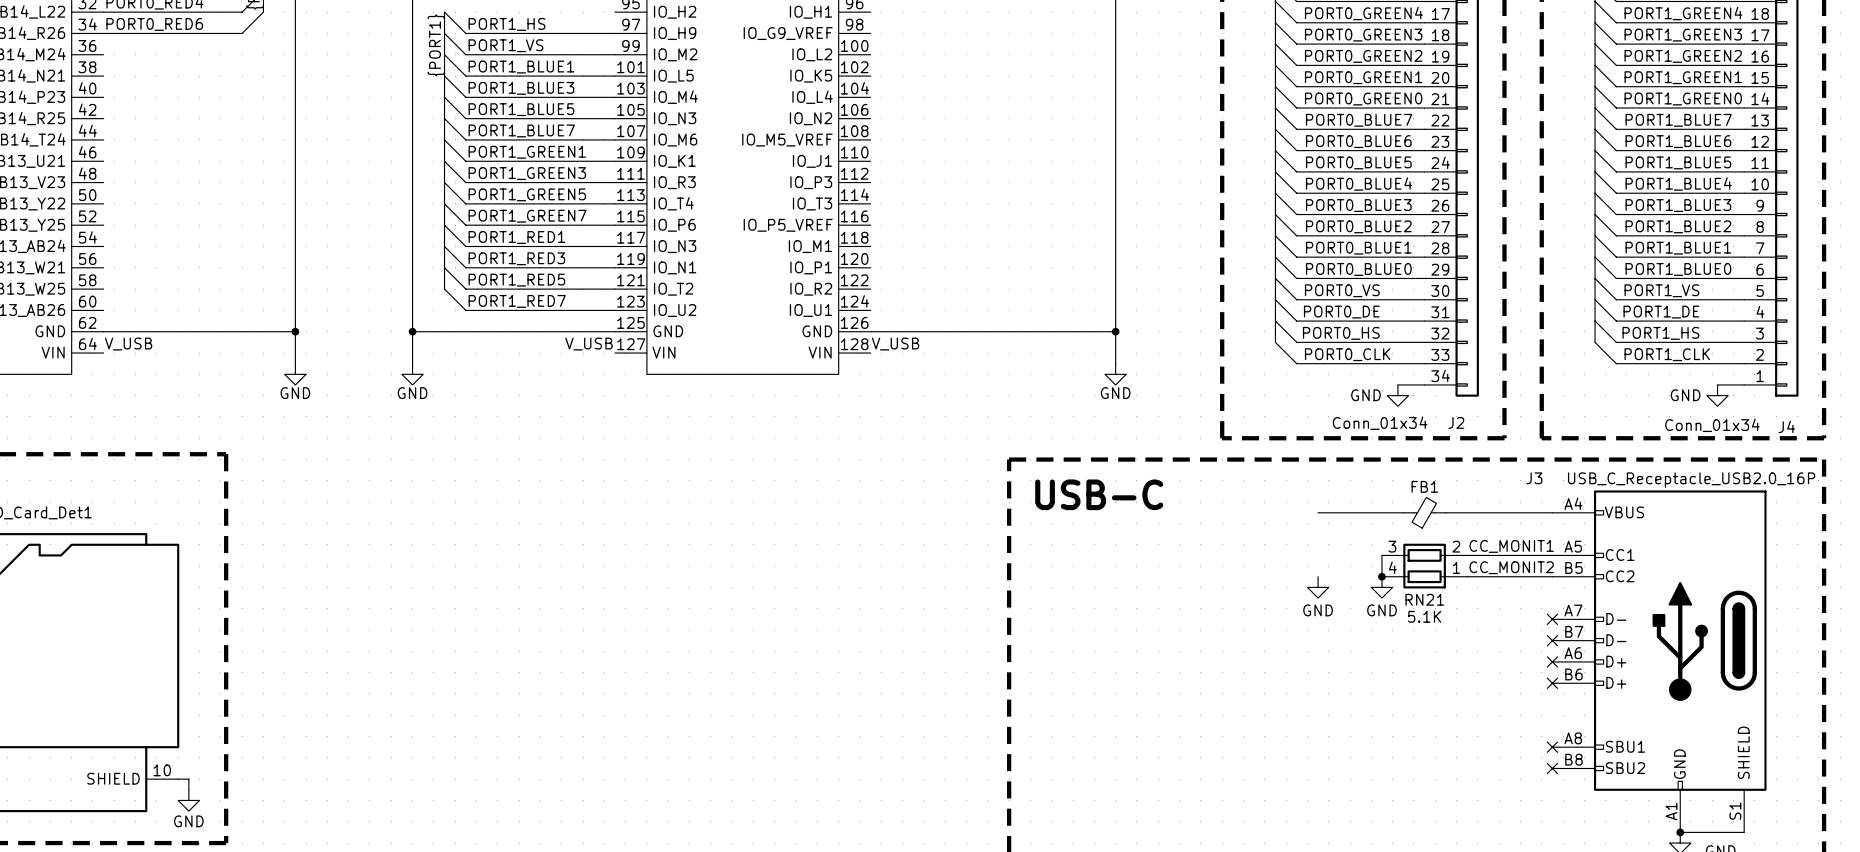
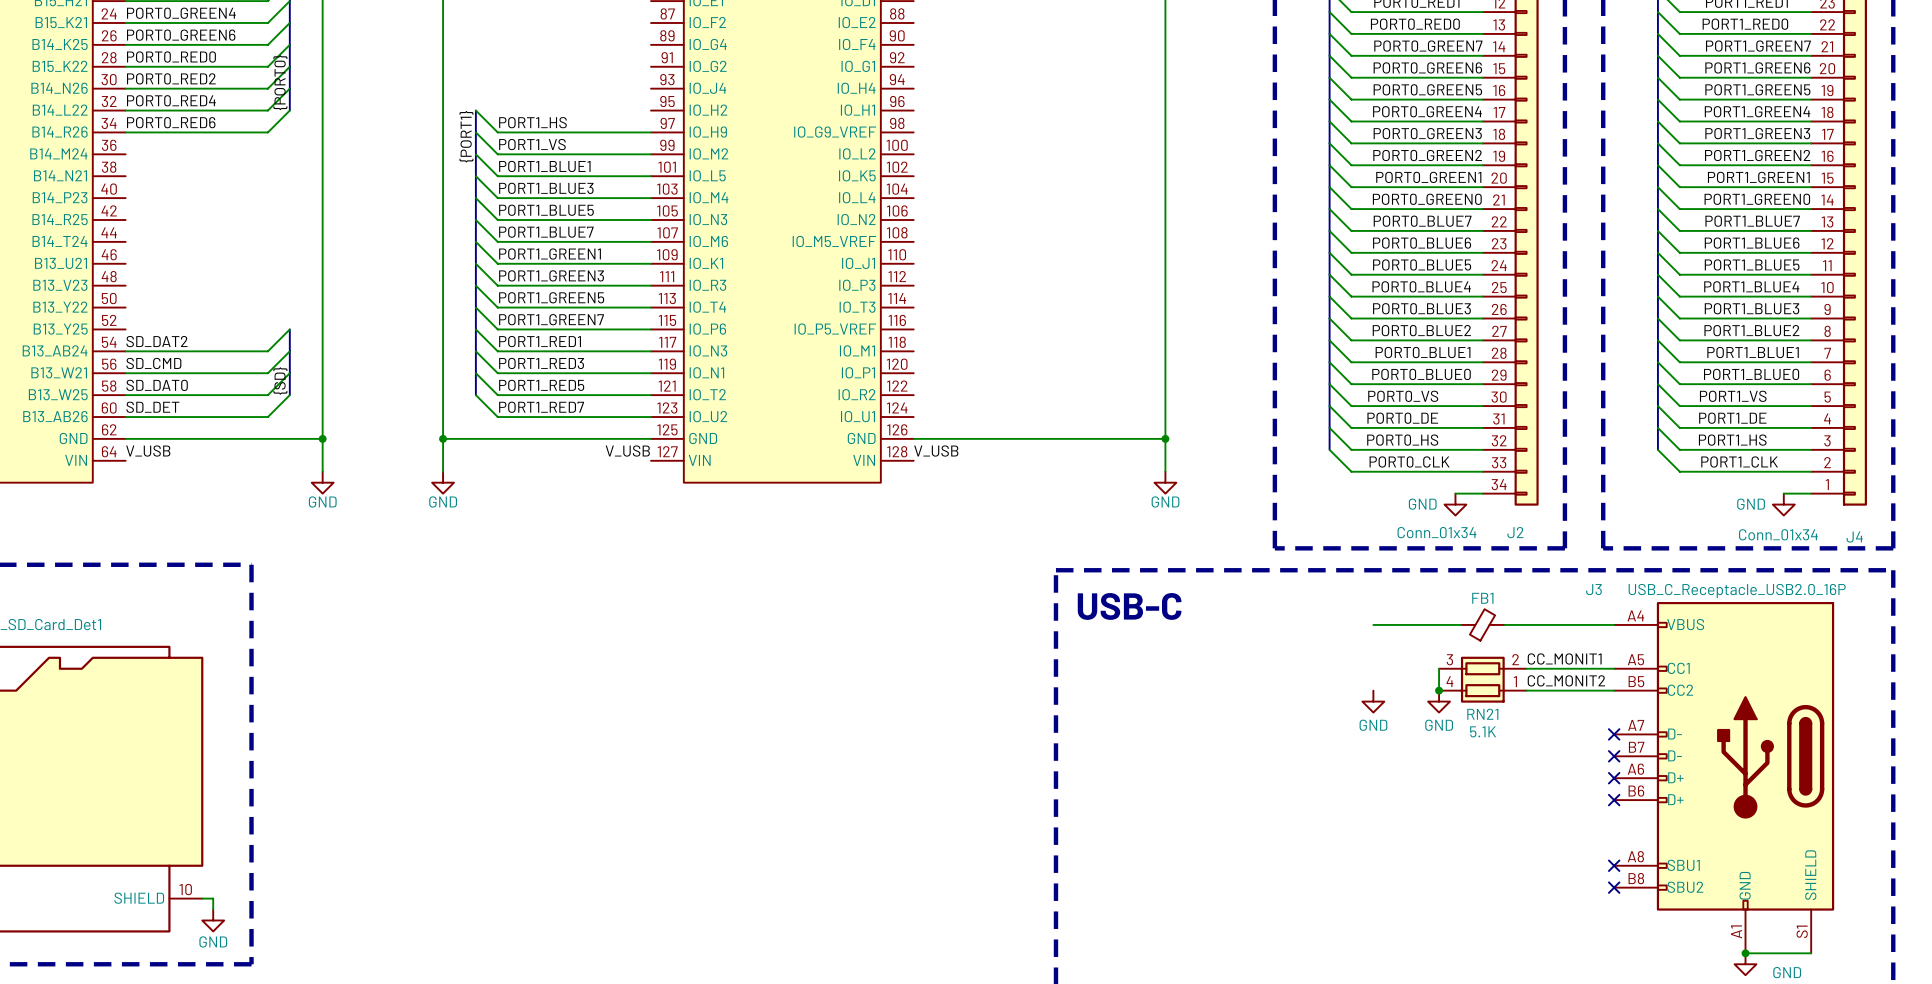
wire: none -> (289, 329) (267, 351) (125, 351)
bus: none -> (289, 329) (289, 395)
label: none -> SD_DAT2 (156, 341)
wire: none -> (289, 351) (267, 373) (125, 373)
label: none -> SD_CMD (153, 363)
wire: none -> (289, 373) (267, 395) (125, 395)
label: none -> {SD} (280, 381)
label: none -> SD_DAT0 (157, 385)
wire: none -> (289, 395) (267, 417) (125, 417)
label: none -> SD_DET (152, 407)

